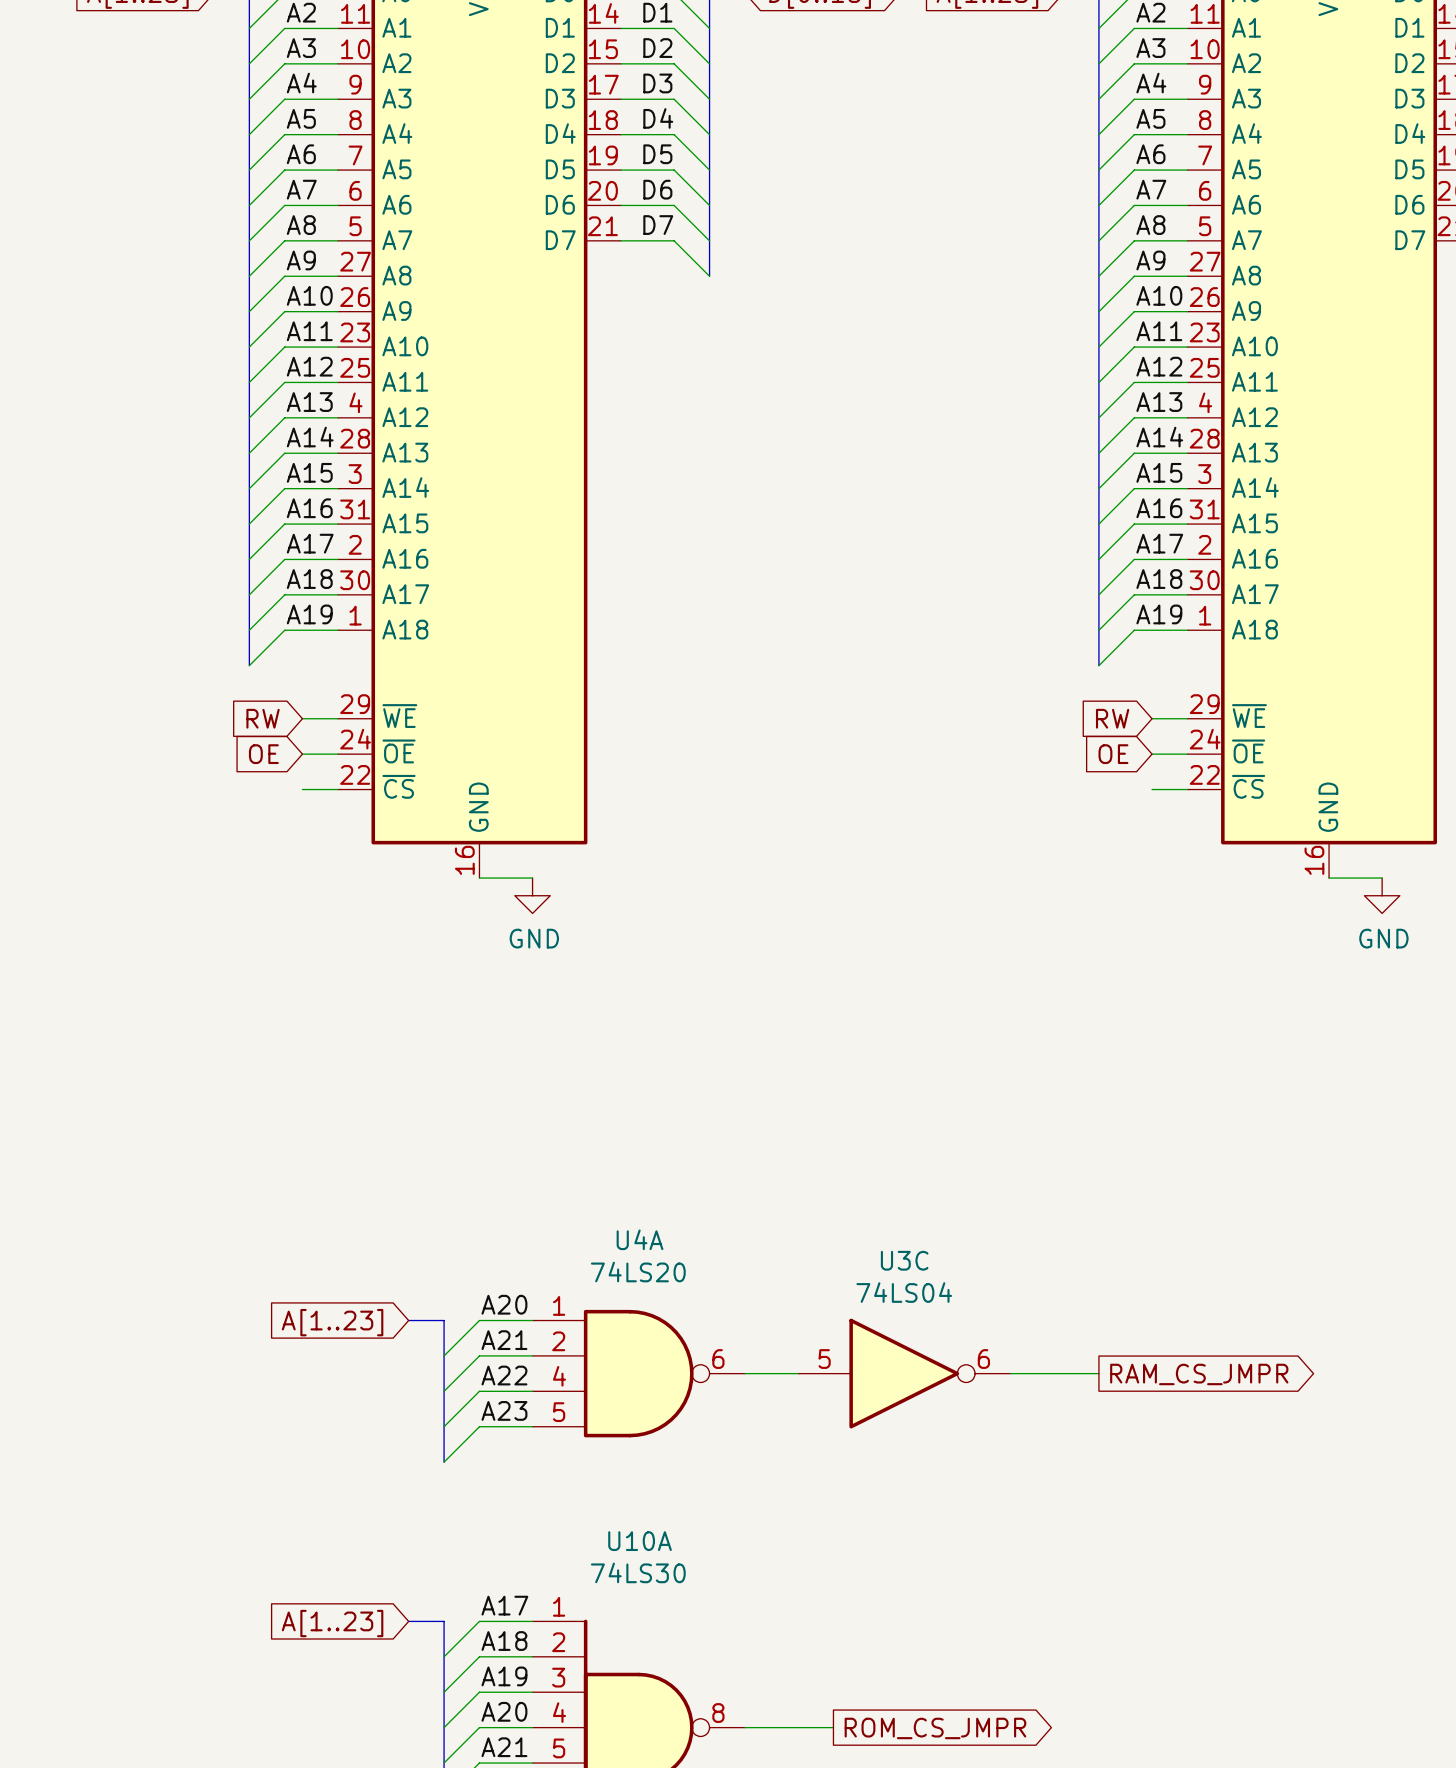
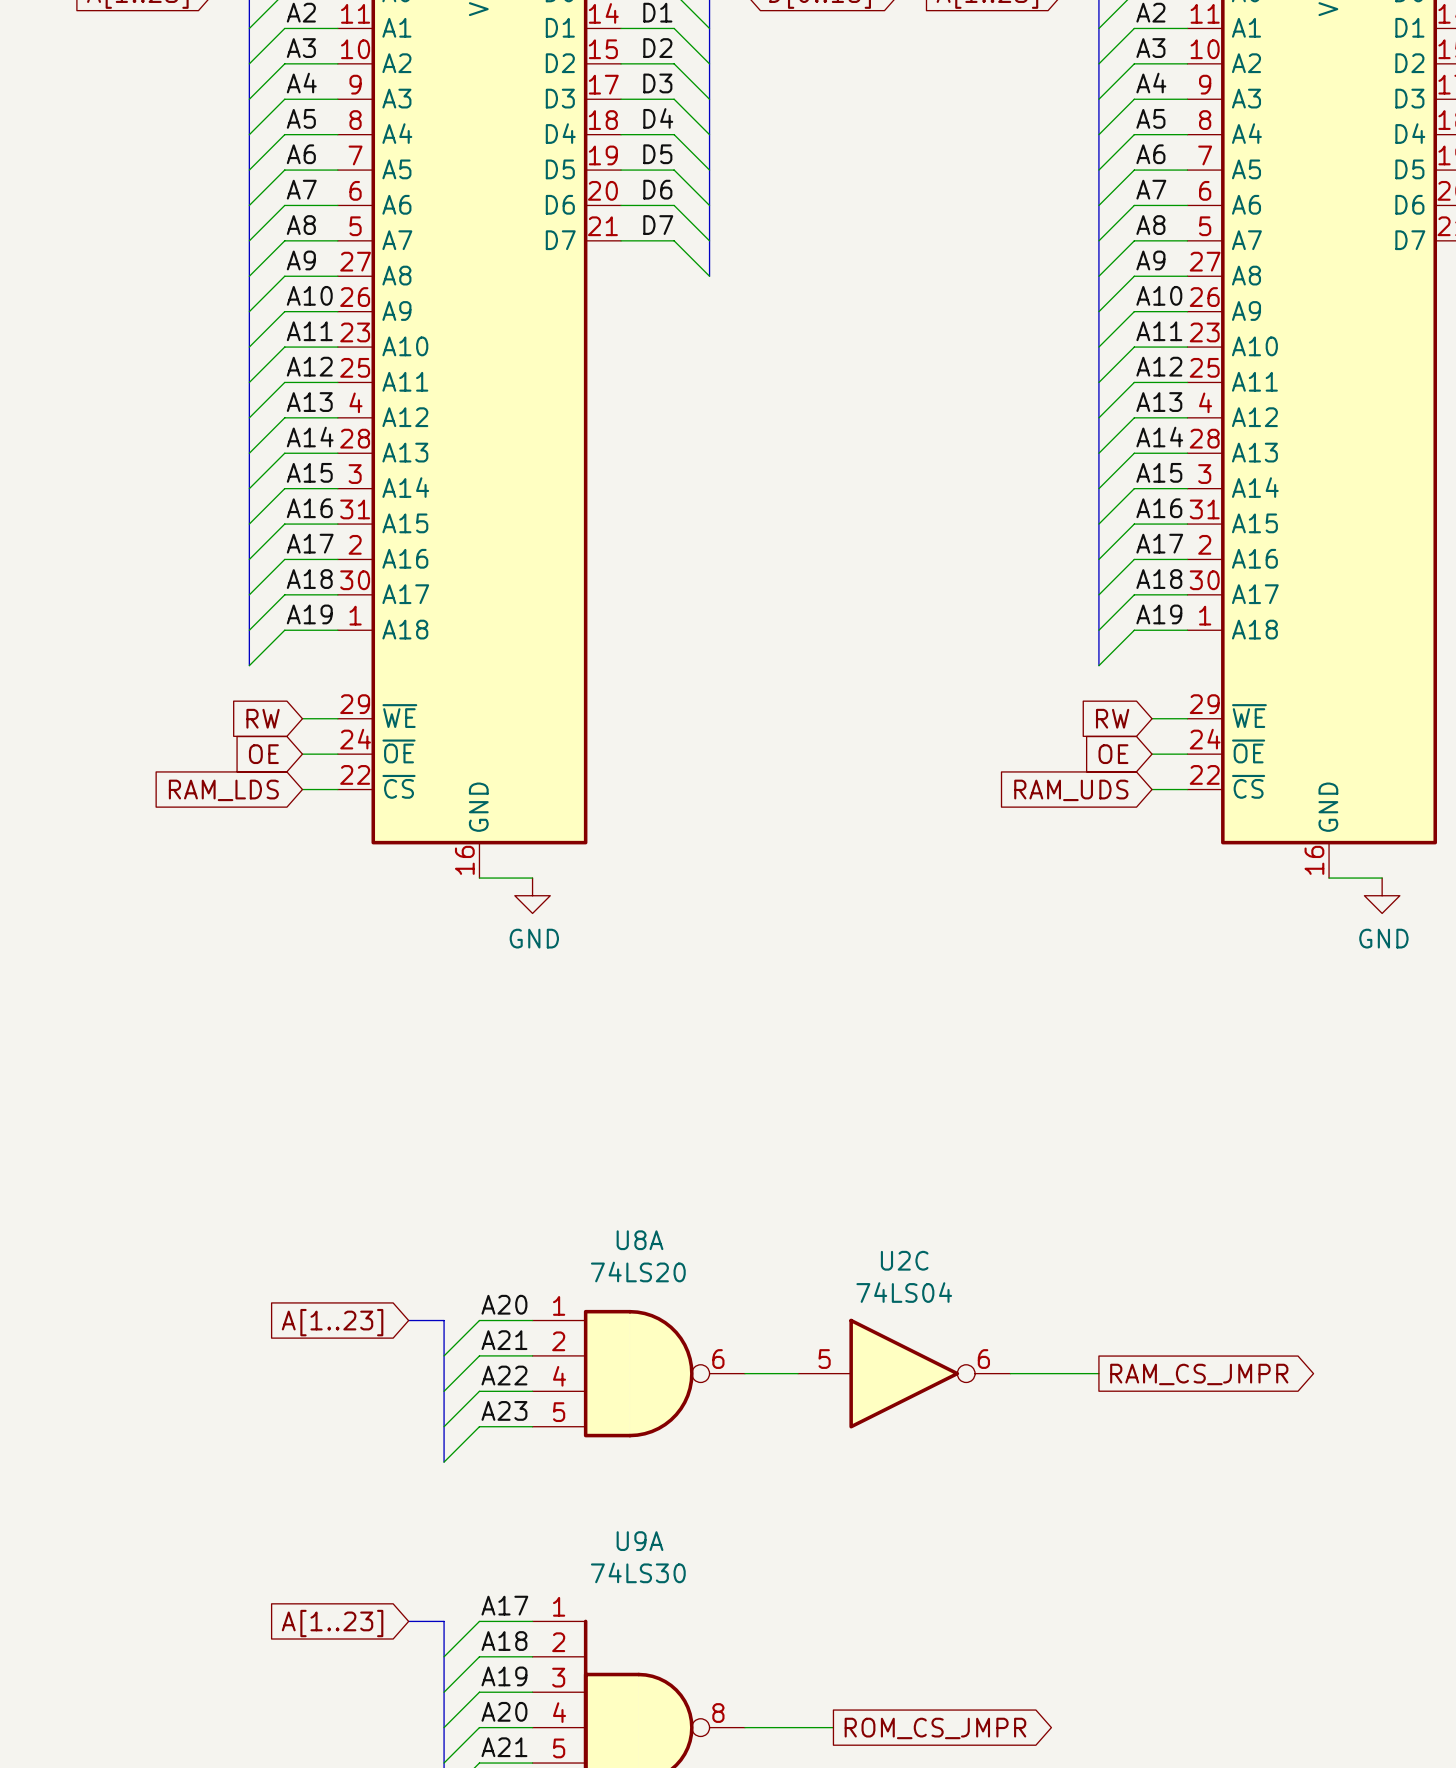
global label: none -> RAM_LDS (223, 790)
global label: none -> RAM_UDS (1071, 790)
U4A name: U4A (640, 1239) -> U8A (640, 1240)
U3C name: U3C (904, 1260) -> U2C (904, 1260)
U10A name: U10A (640, 1541) -> U9A (640, 1541)

